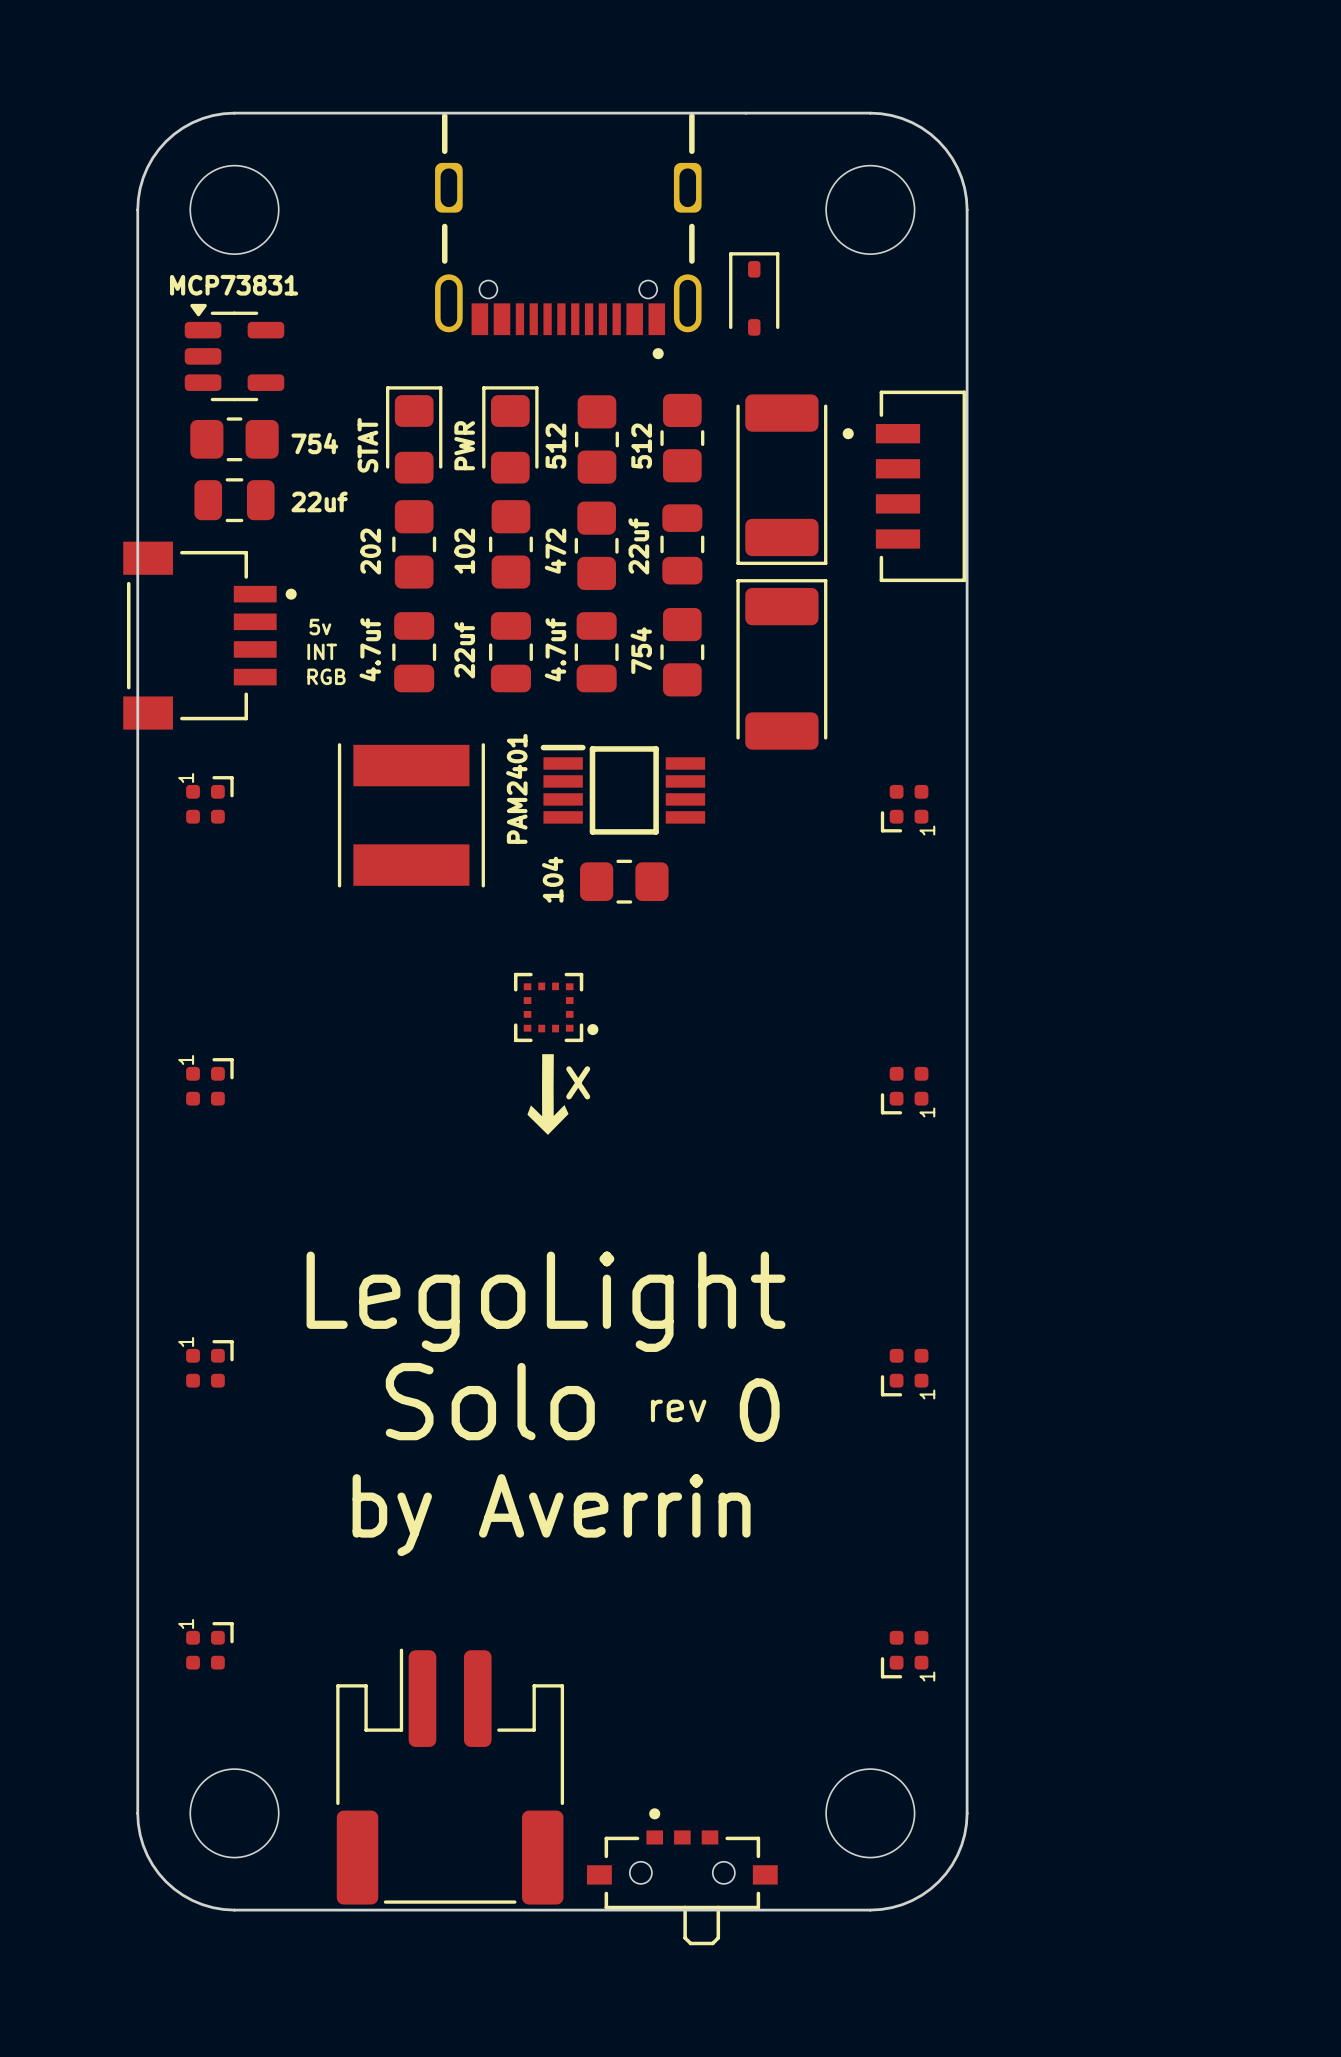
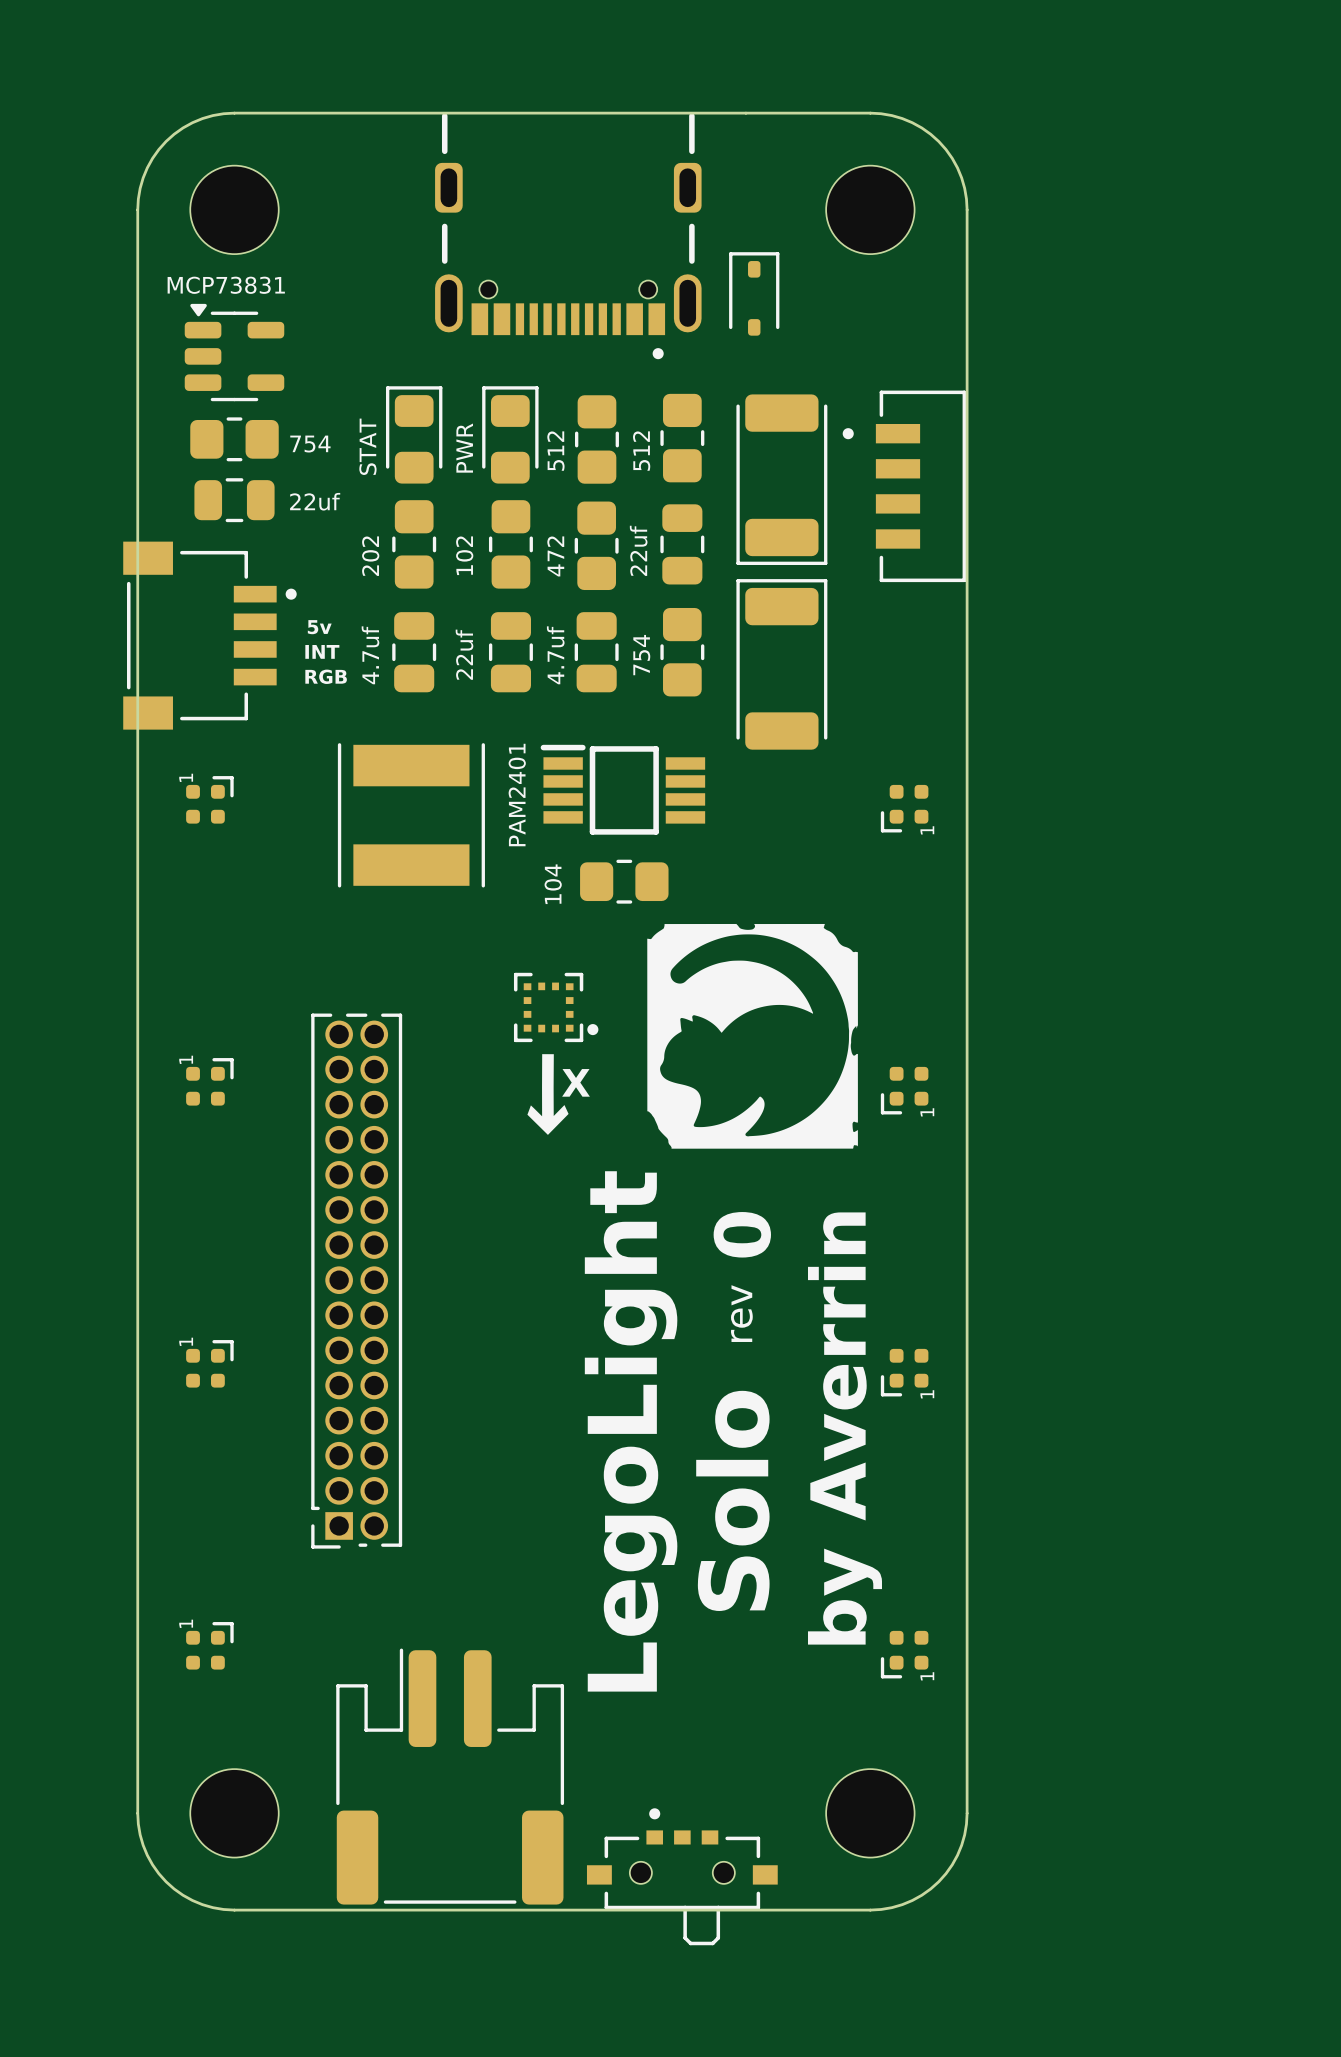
drawing: none -> [647, 923, 858, 1149]
part: none -> (356, 1281)
text rotation: 0° (546, 1301) -> 90° counterclockwise (631, 1431)
text rotation: 0° (490, 1401) -> 90° counterclockwise (732, 1500)
text rotation: 0° (678, 1410) -> 90° counterclockwise (741, 1313)
text position: rev (678, 1410) -> rev (741, 1313)
text rotation: 0° (759, 1410) -> 90° counterclockwise (742, 1234)
text position: 0 (759, 1410) -> 0 (742, 1234)
text rotation: 0° (551, 1515) -> 90° counterclockwise (844, 1428)

